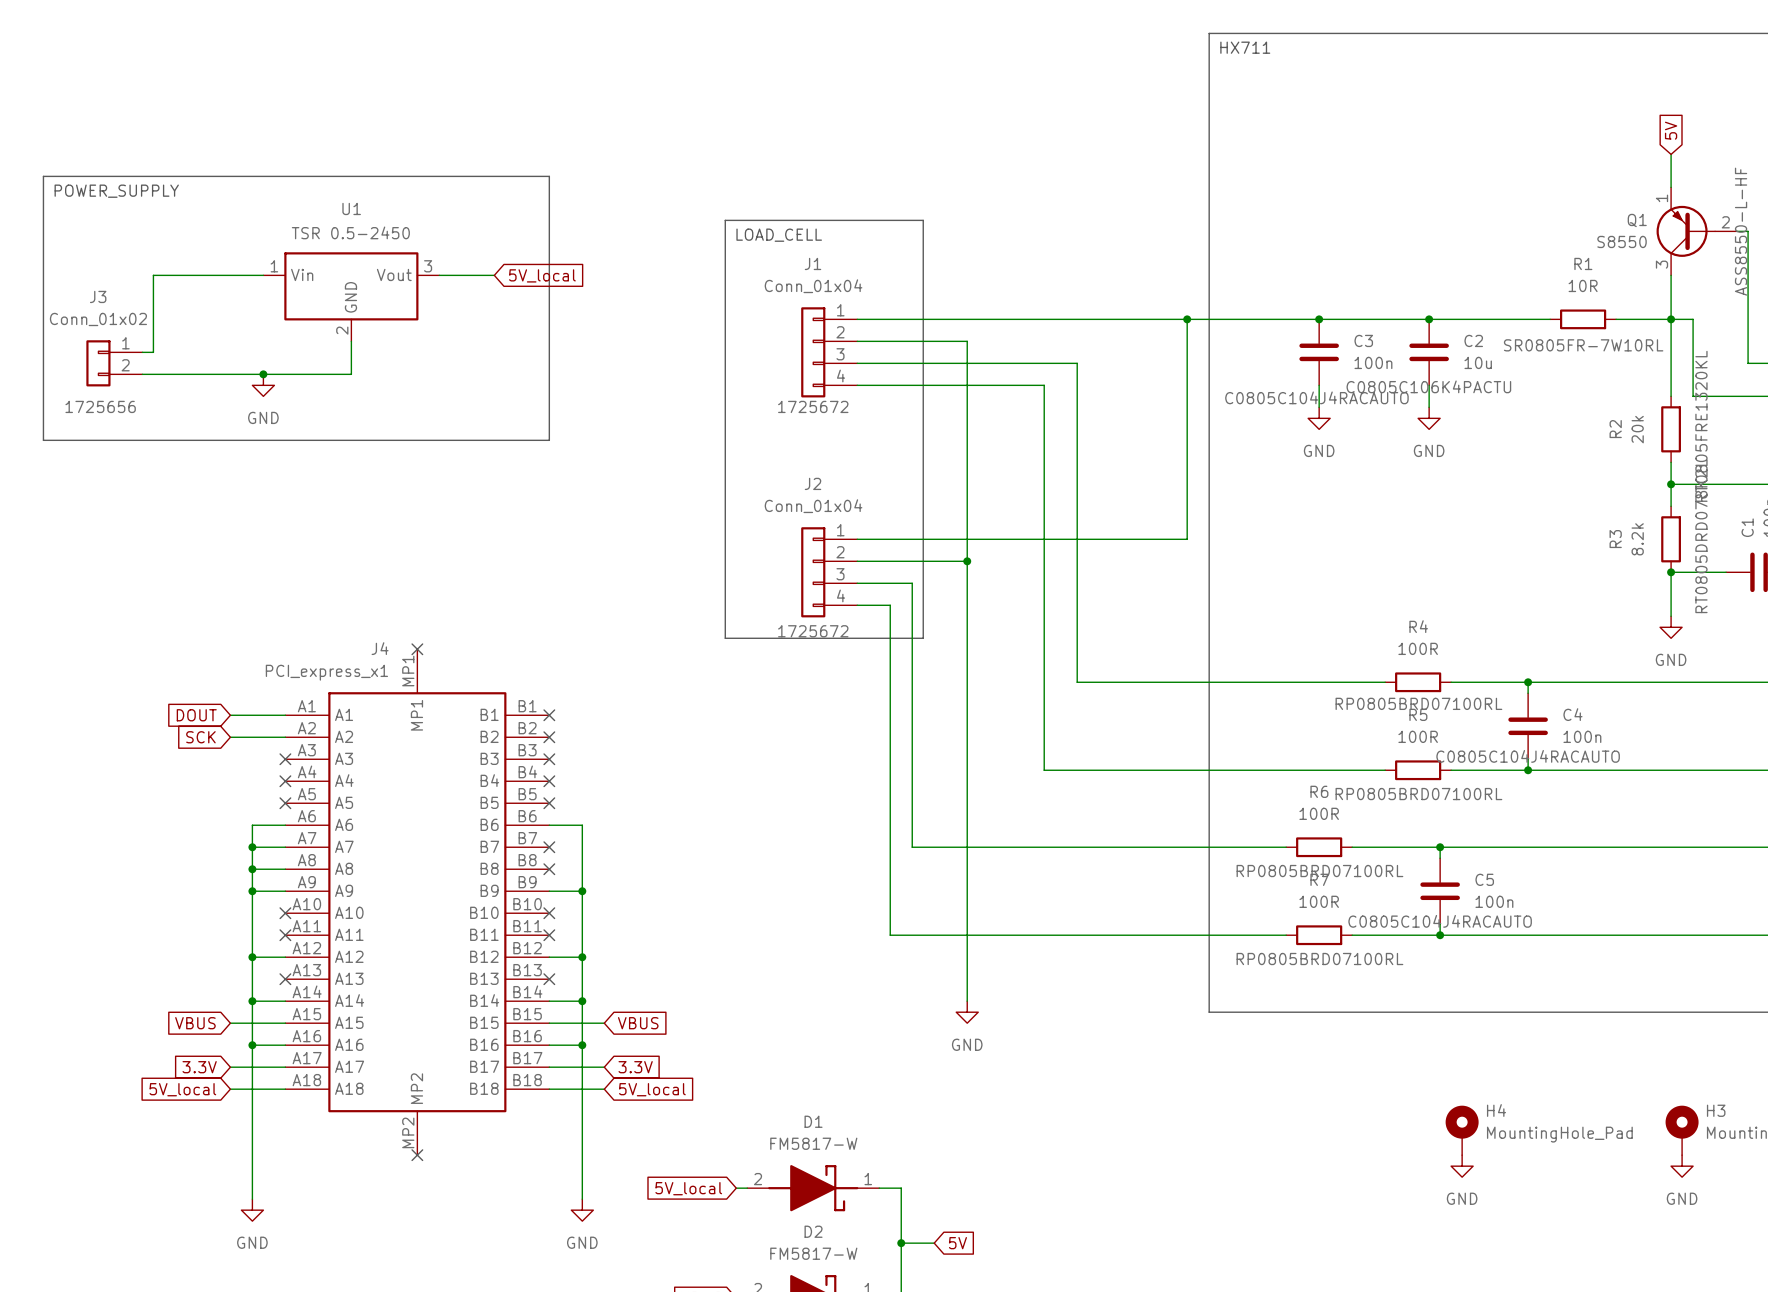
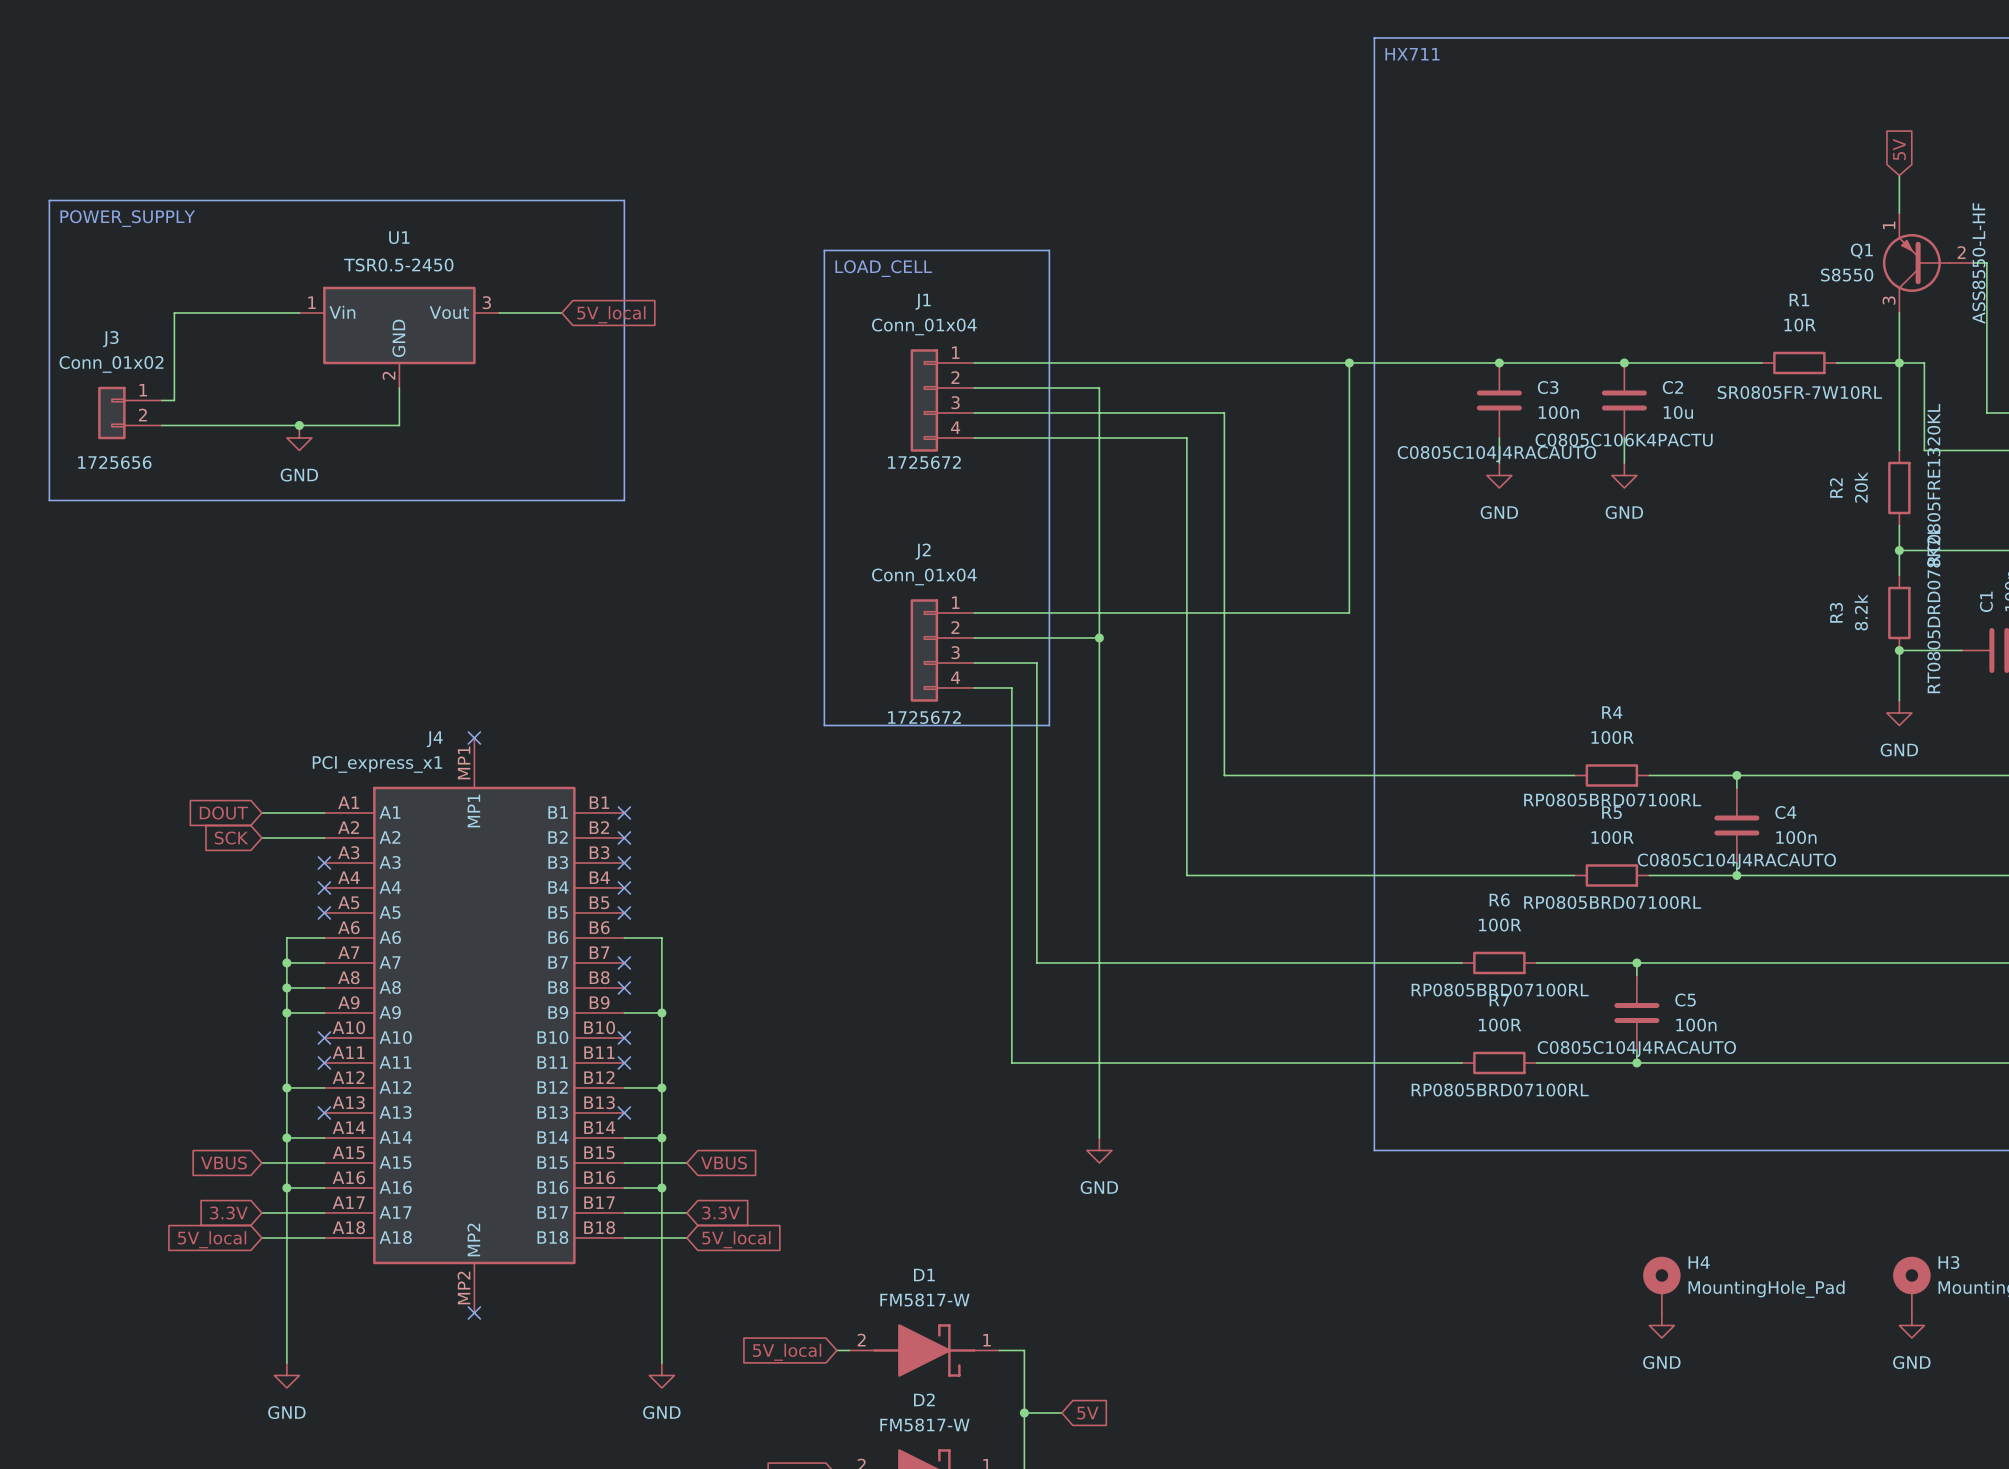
U1 text: TSR 0.5-2450 (350, 232) -> TSR0.5-2450 (398, 265)

